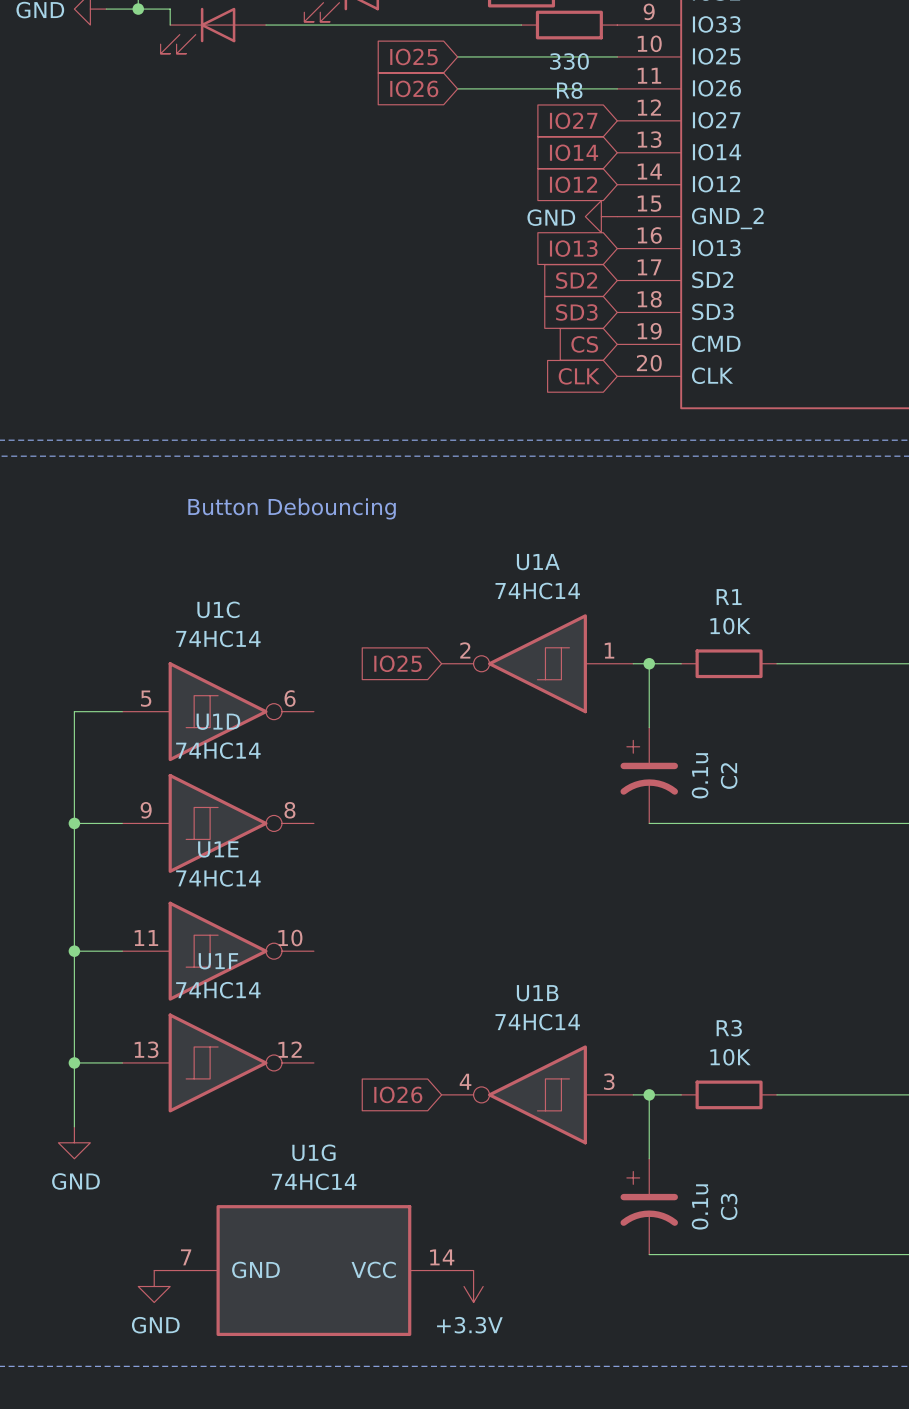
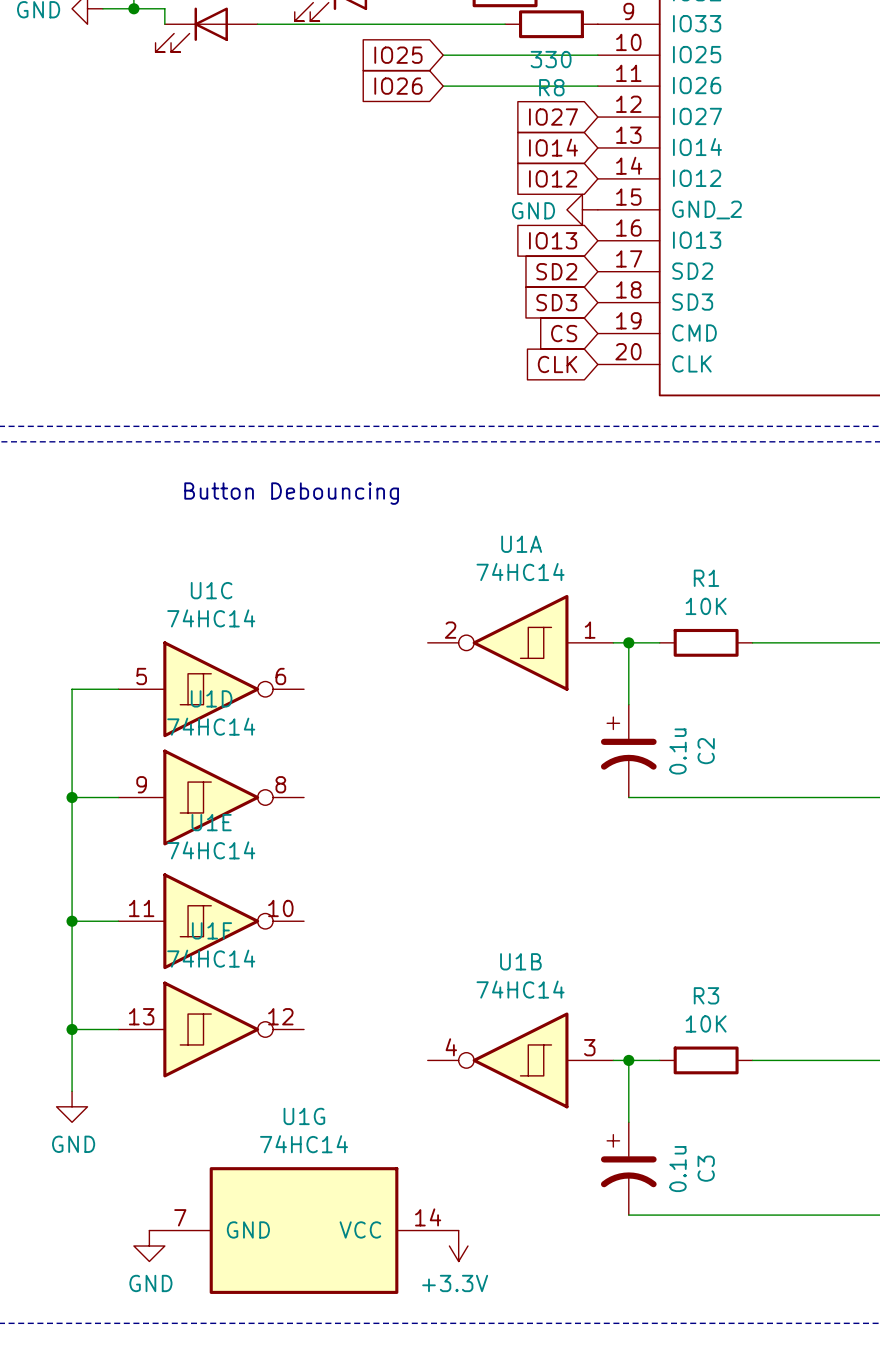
global label: IO25 (398, 663) -> none
global label: IO26 (398, 1094) -> none

